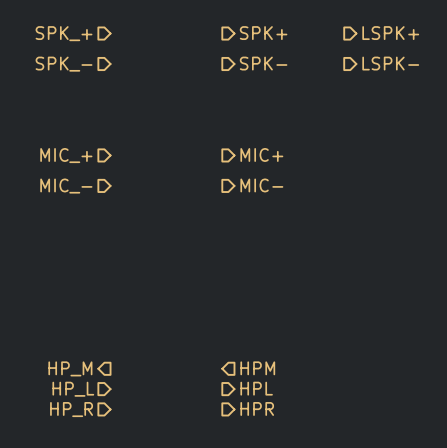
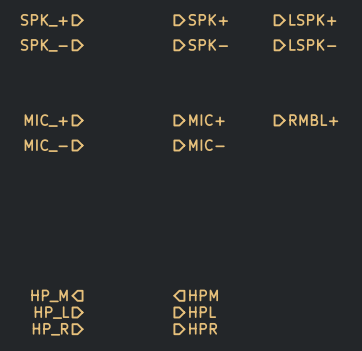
hierarchical label: none -> RMBL+ (313, 120)

